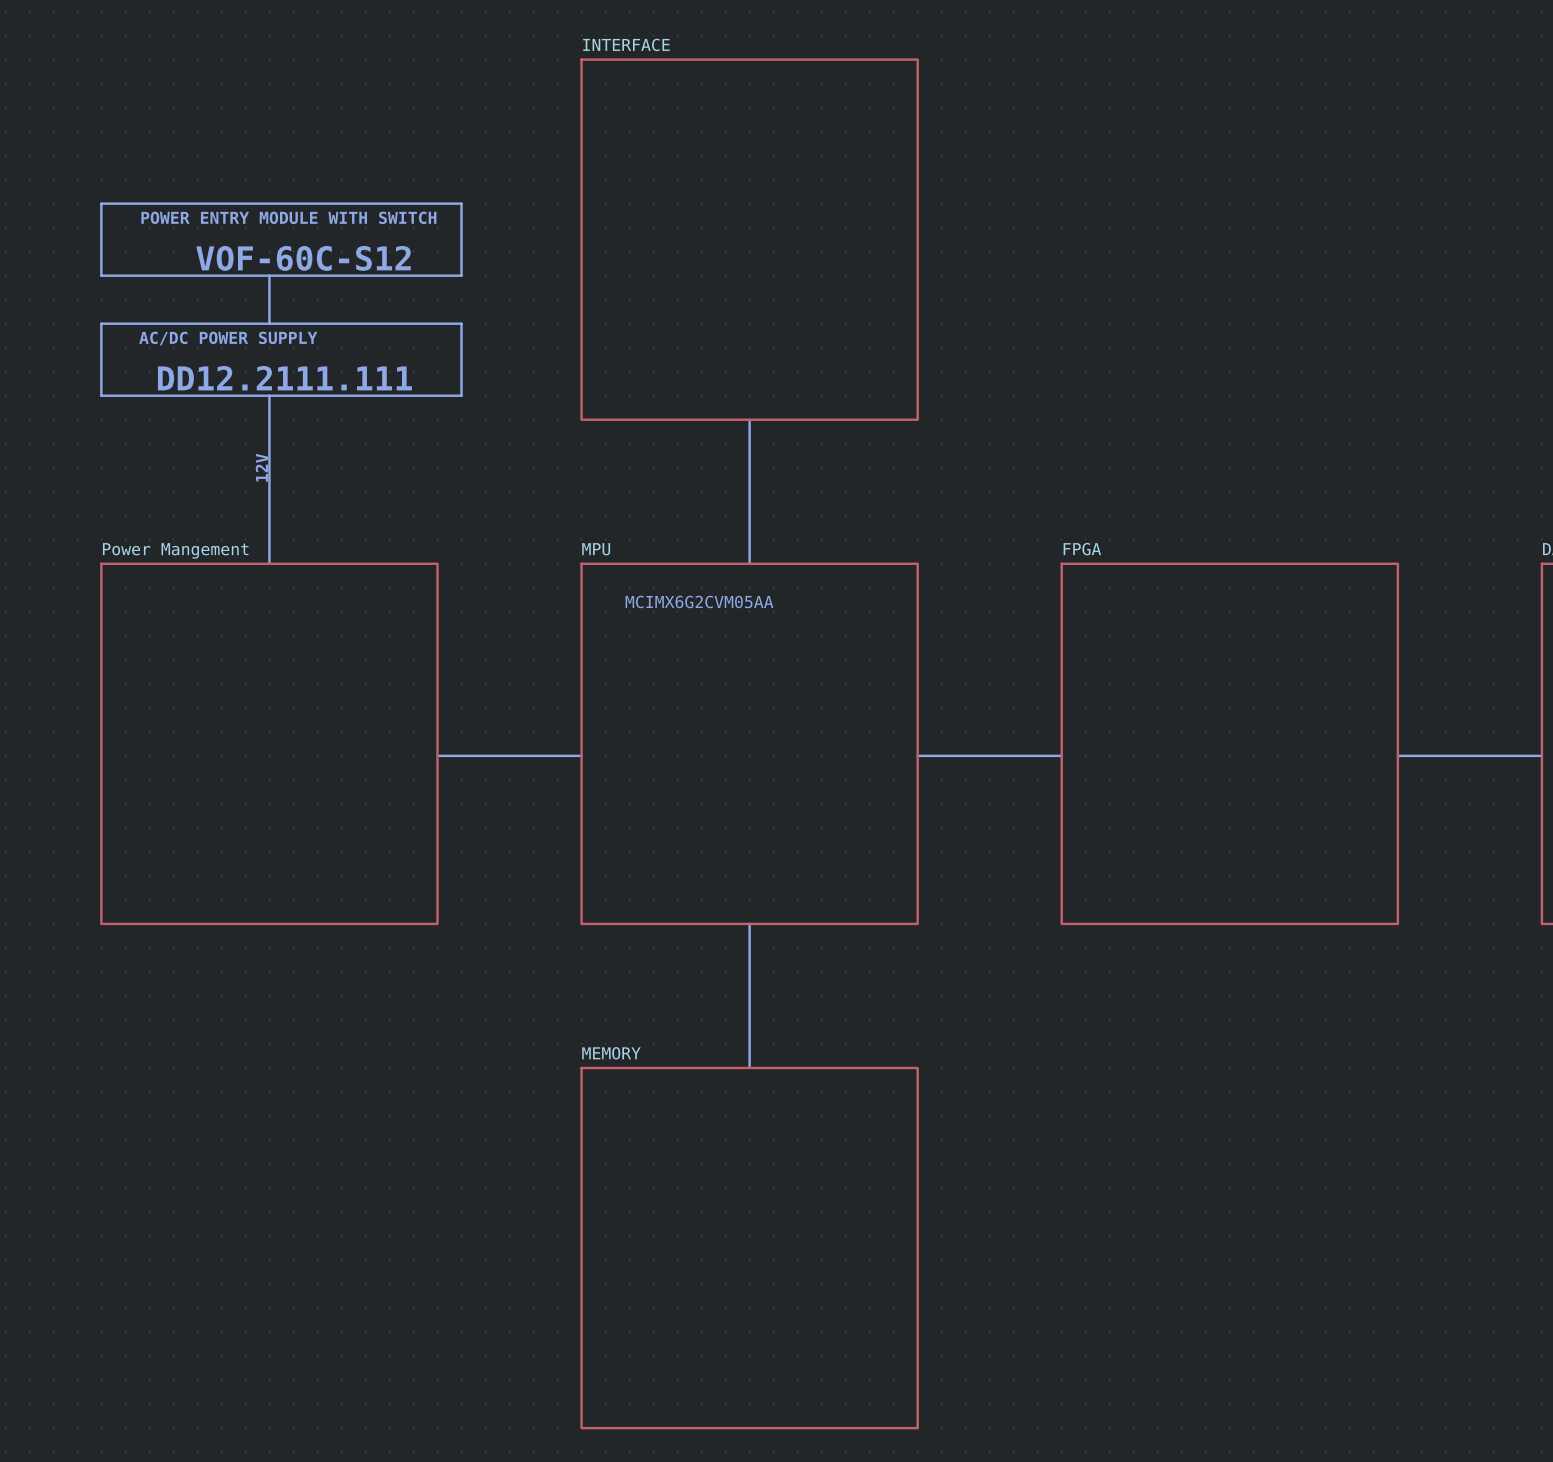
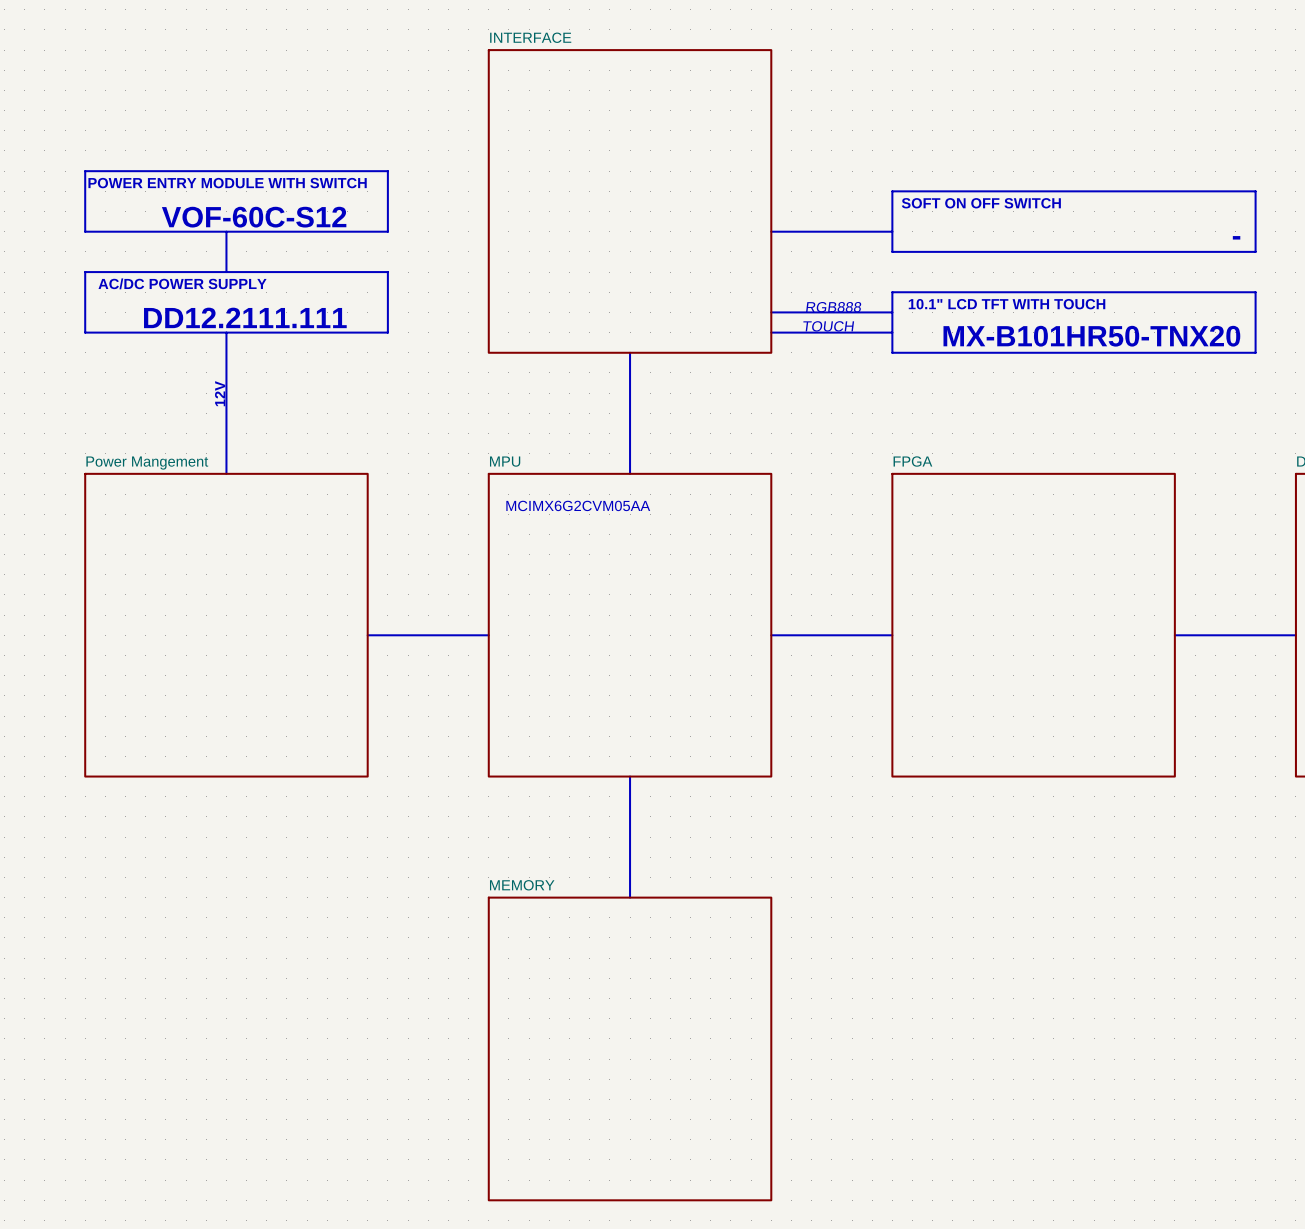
line: none -> (892, 191) (892, 251) (1255, 251) (1255, 191) (892, 191)
text: none -> SOFT ON OFF SWITCH (981, 203)
line: none -> (771, 231) (892, 231)
text: none -> - (1236, 237)
line: none -> (892, 292) (892, 352) (1255, 352) (1255, 292) (892, 292)
text: none -> 10.1" LCD TFT WITH TOUCH (1007, 304)
text: none -> RGB888 (833, 307)
line: none -> (771, 312) (892, 312)
text: none -> TOUCH (828, 326)
line: none -> (771, 332) (892, 332)
text: none -> MX-B101HR50-TNX20 (1091, 336)

